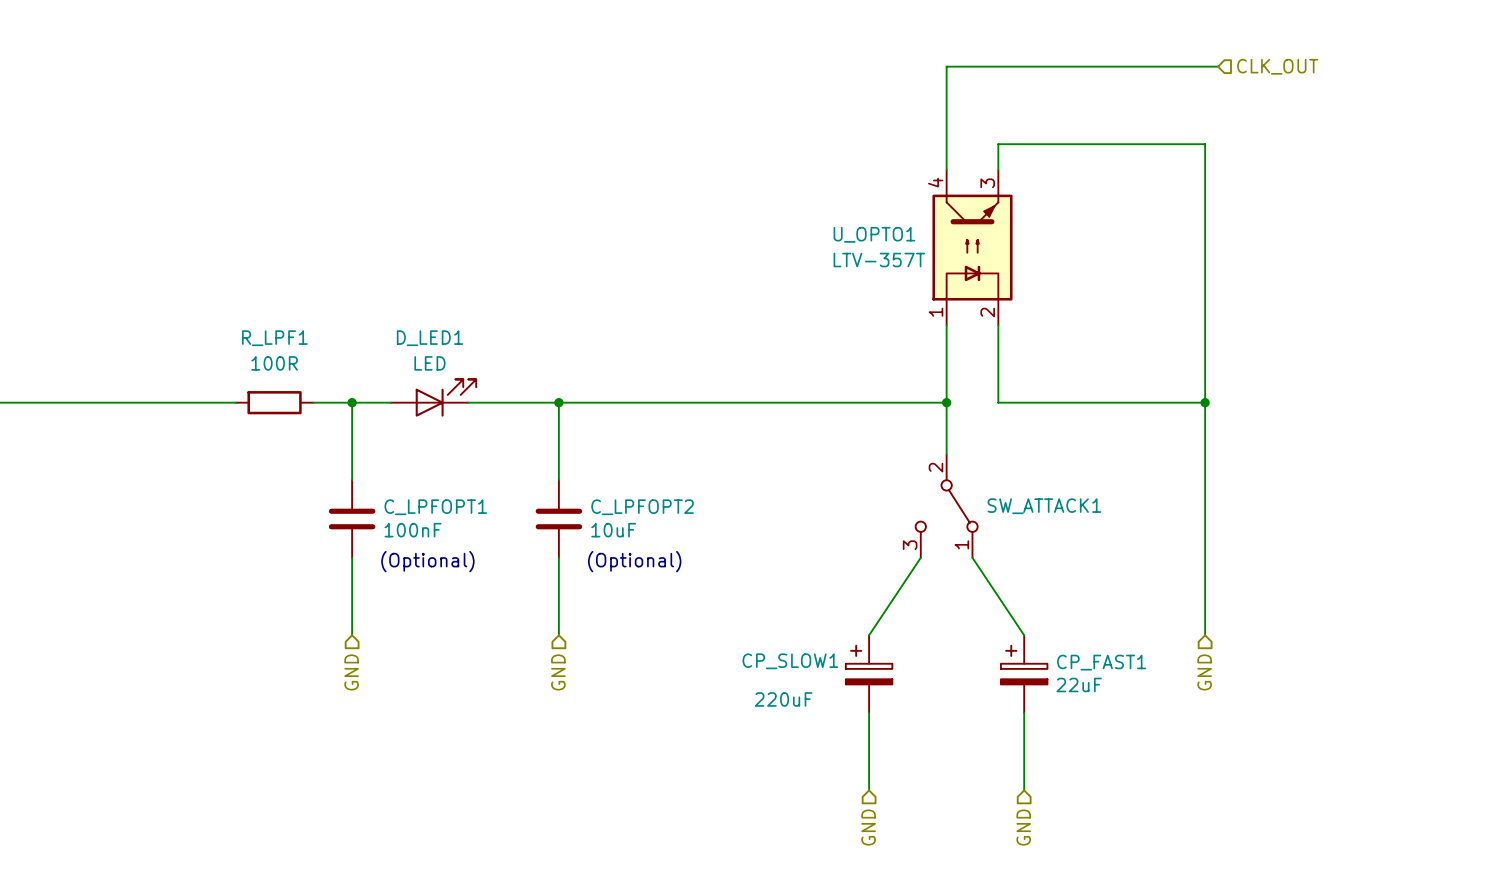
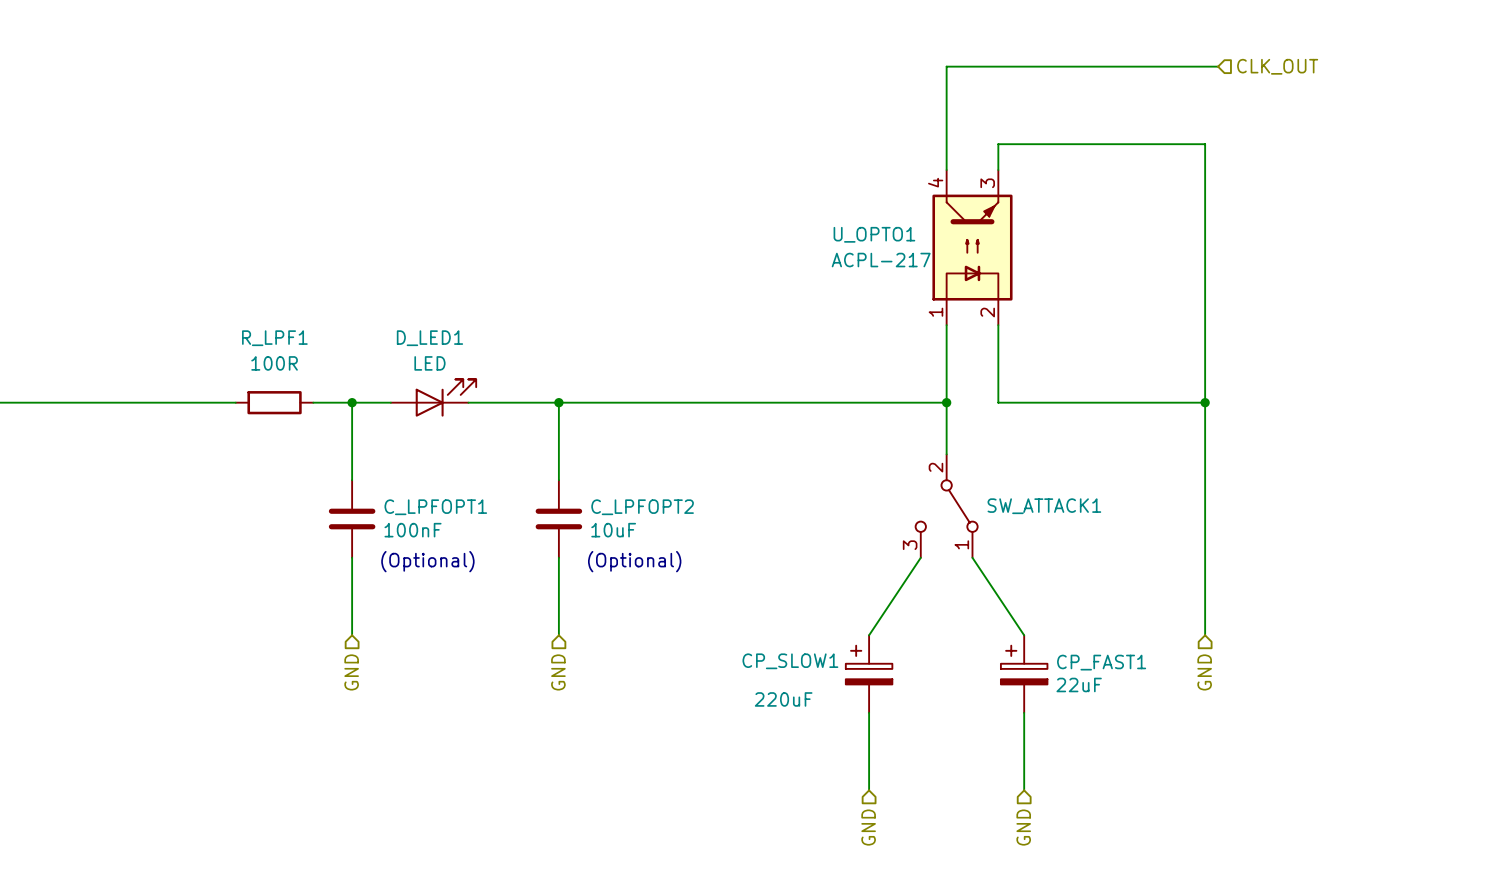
U_OPTO1 value: LTV-357T (879, 260) -> ACPL-217 (881, 260)

